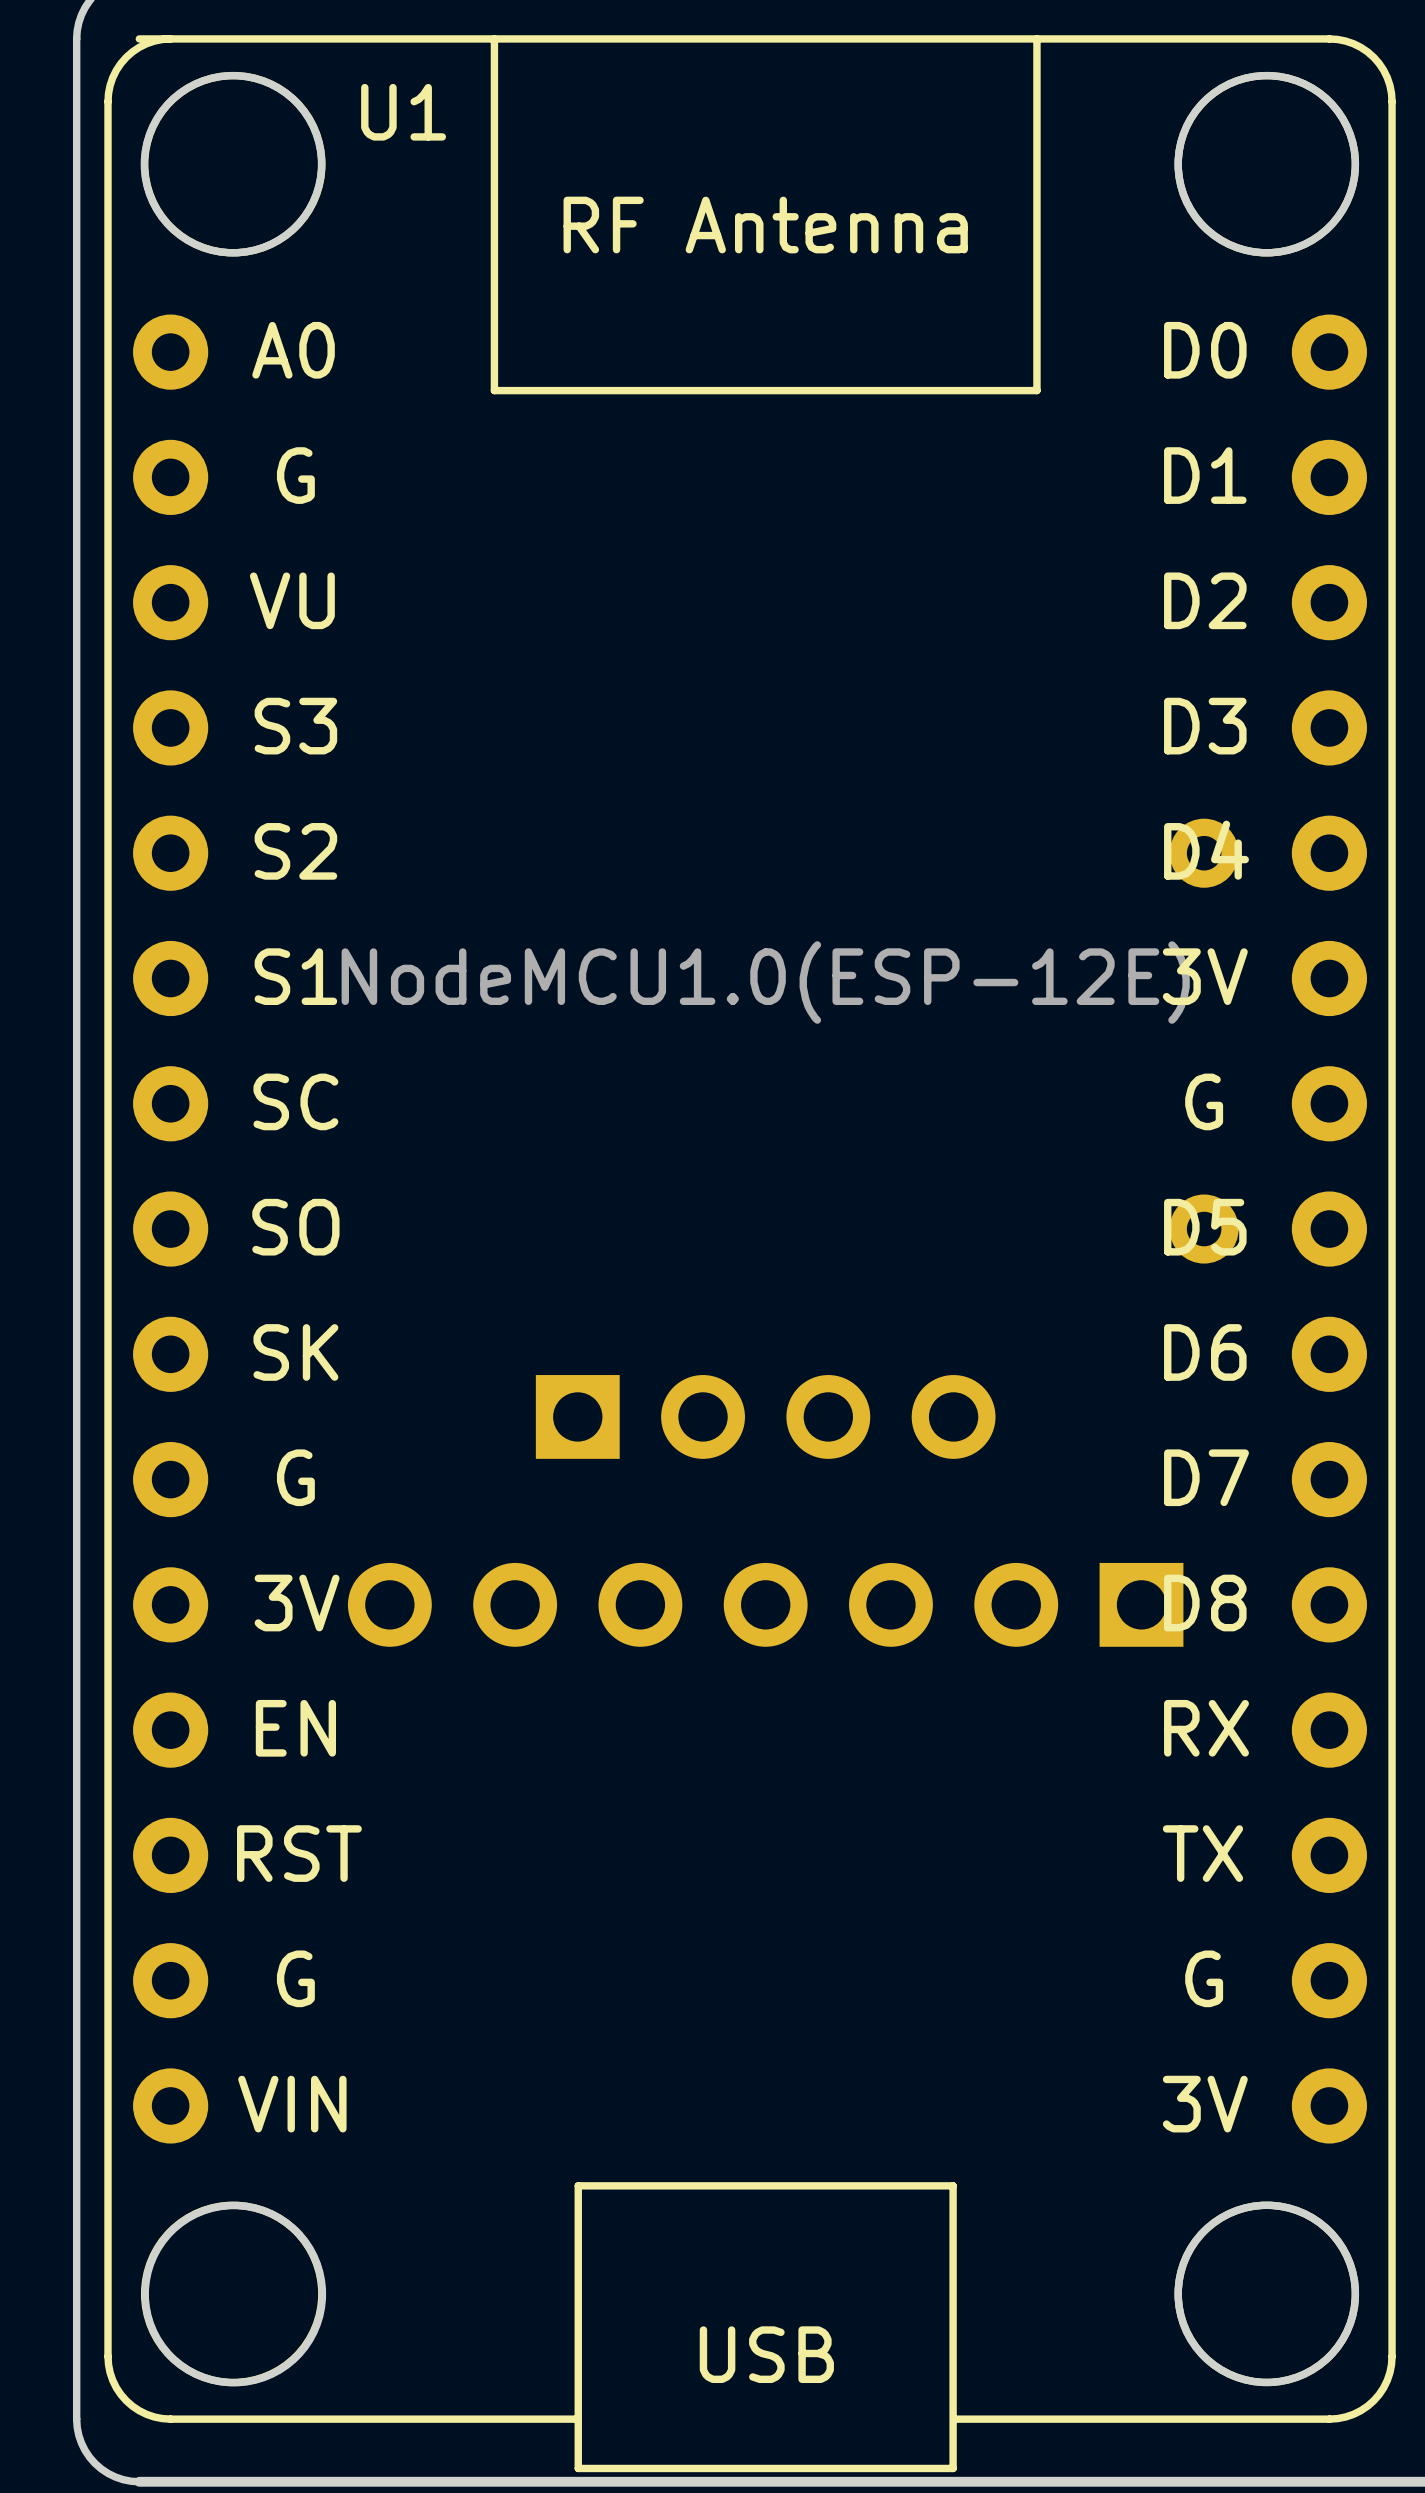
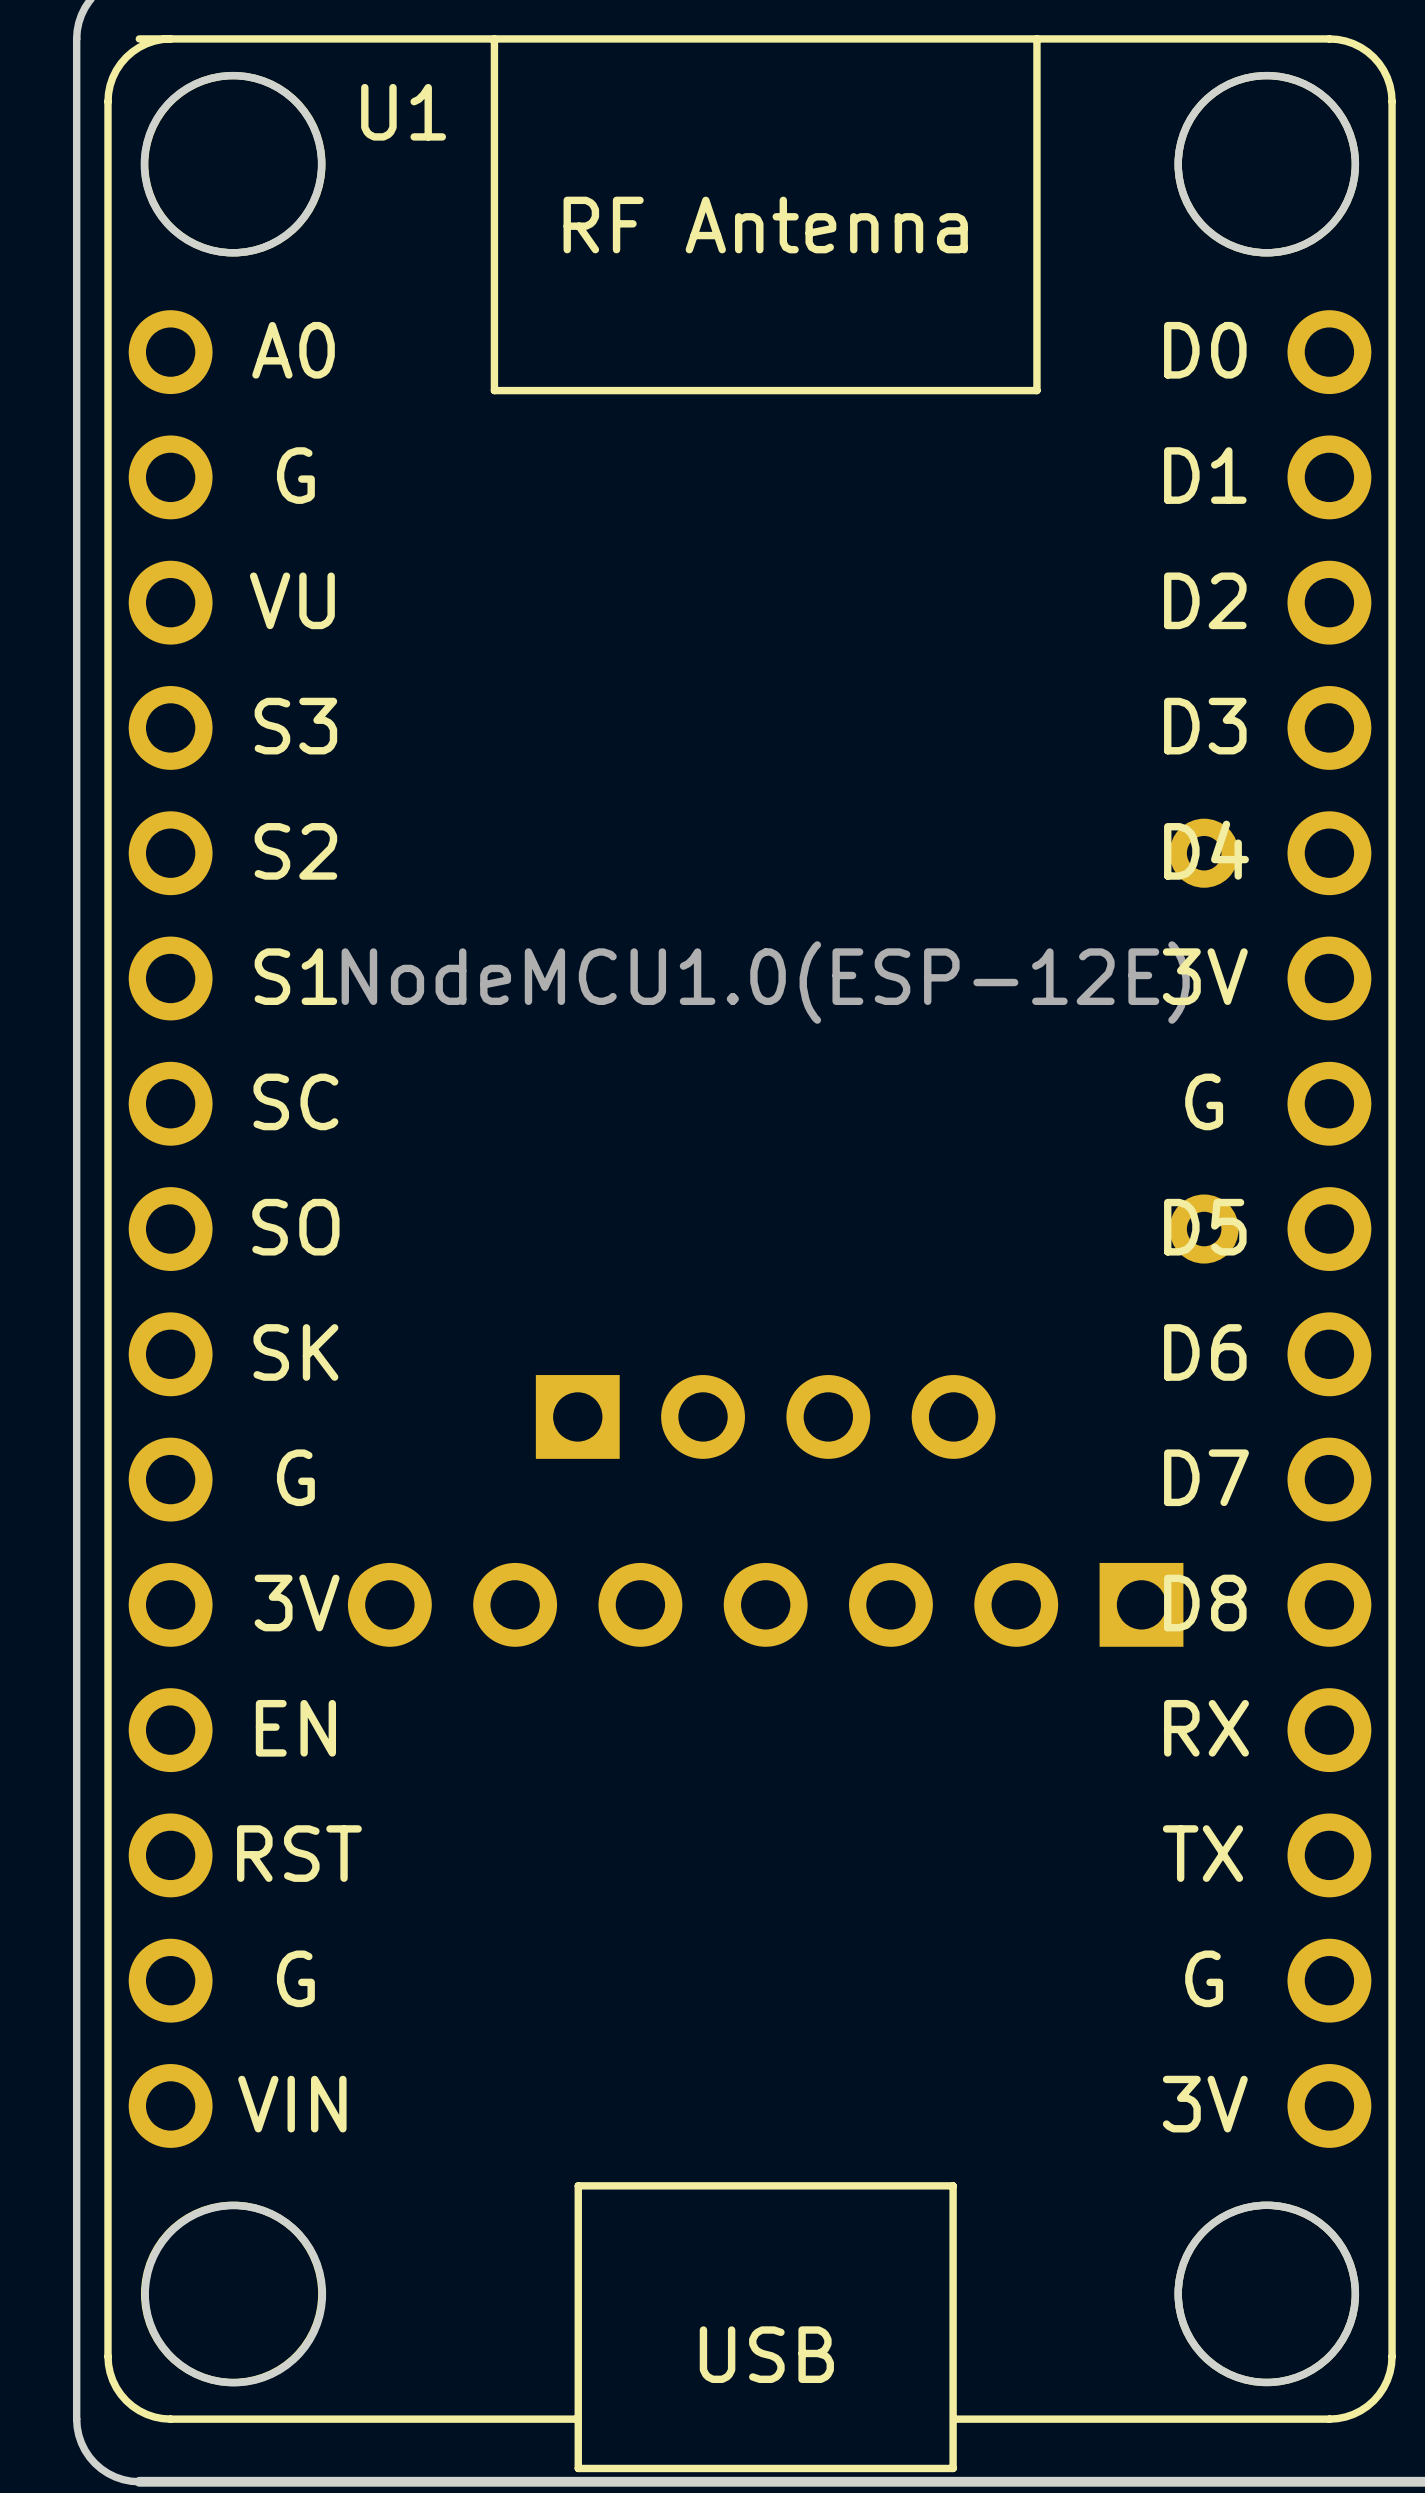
U1 footprint: [104, 35, 1396, 2473] -> [104, 35, 1396, 2473]

